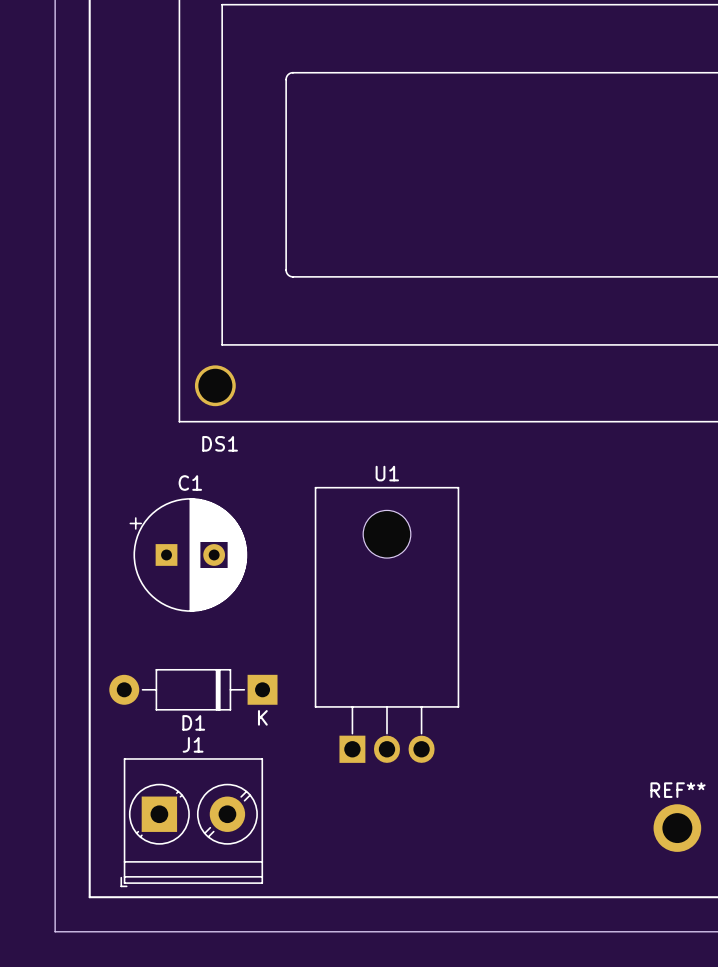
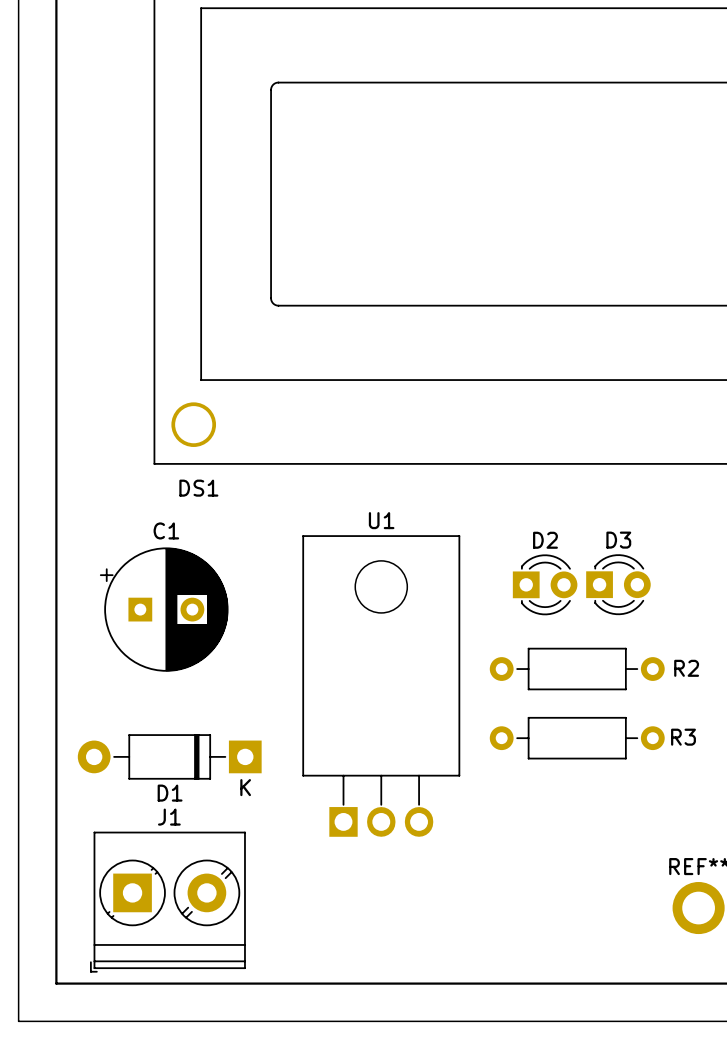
D2: none -> (545, 584)
D3: none -> (618, 584)
R2: none -> (577, 669)
R3: none -> (577, 738)

